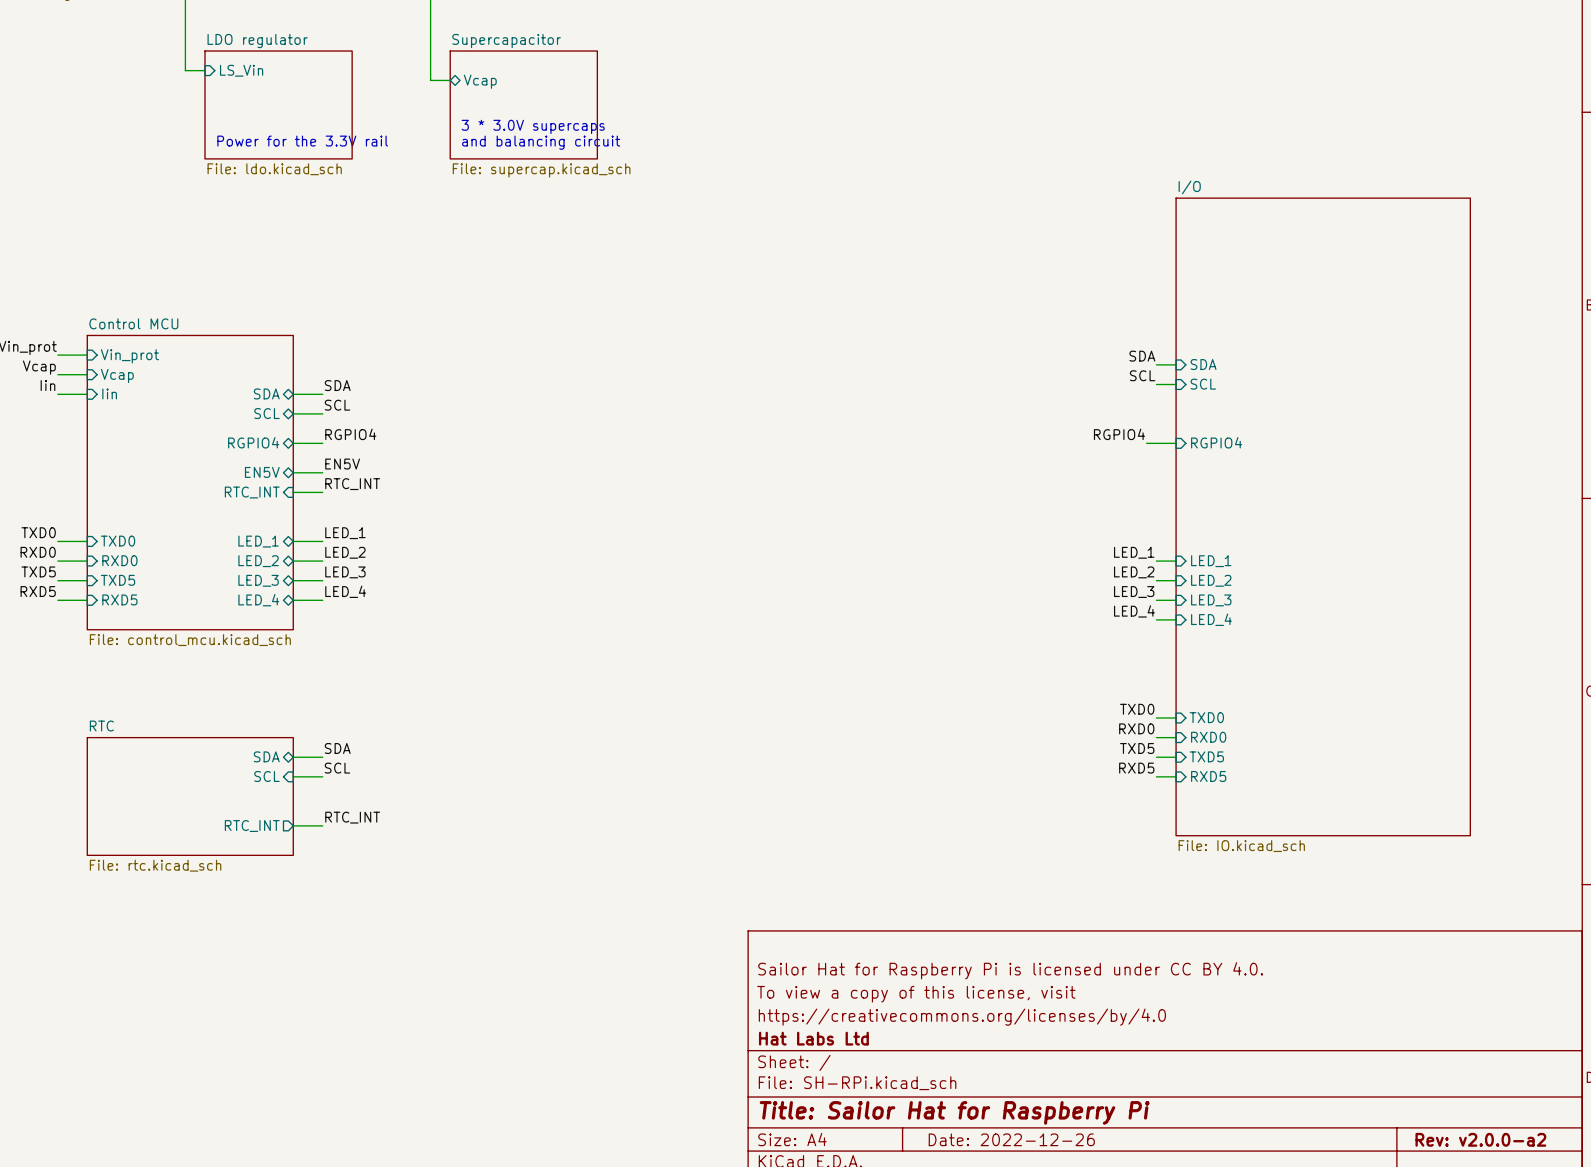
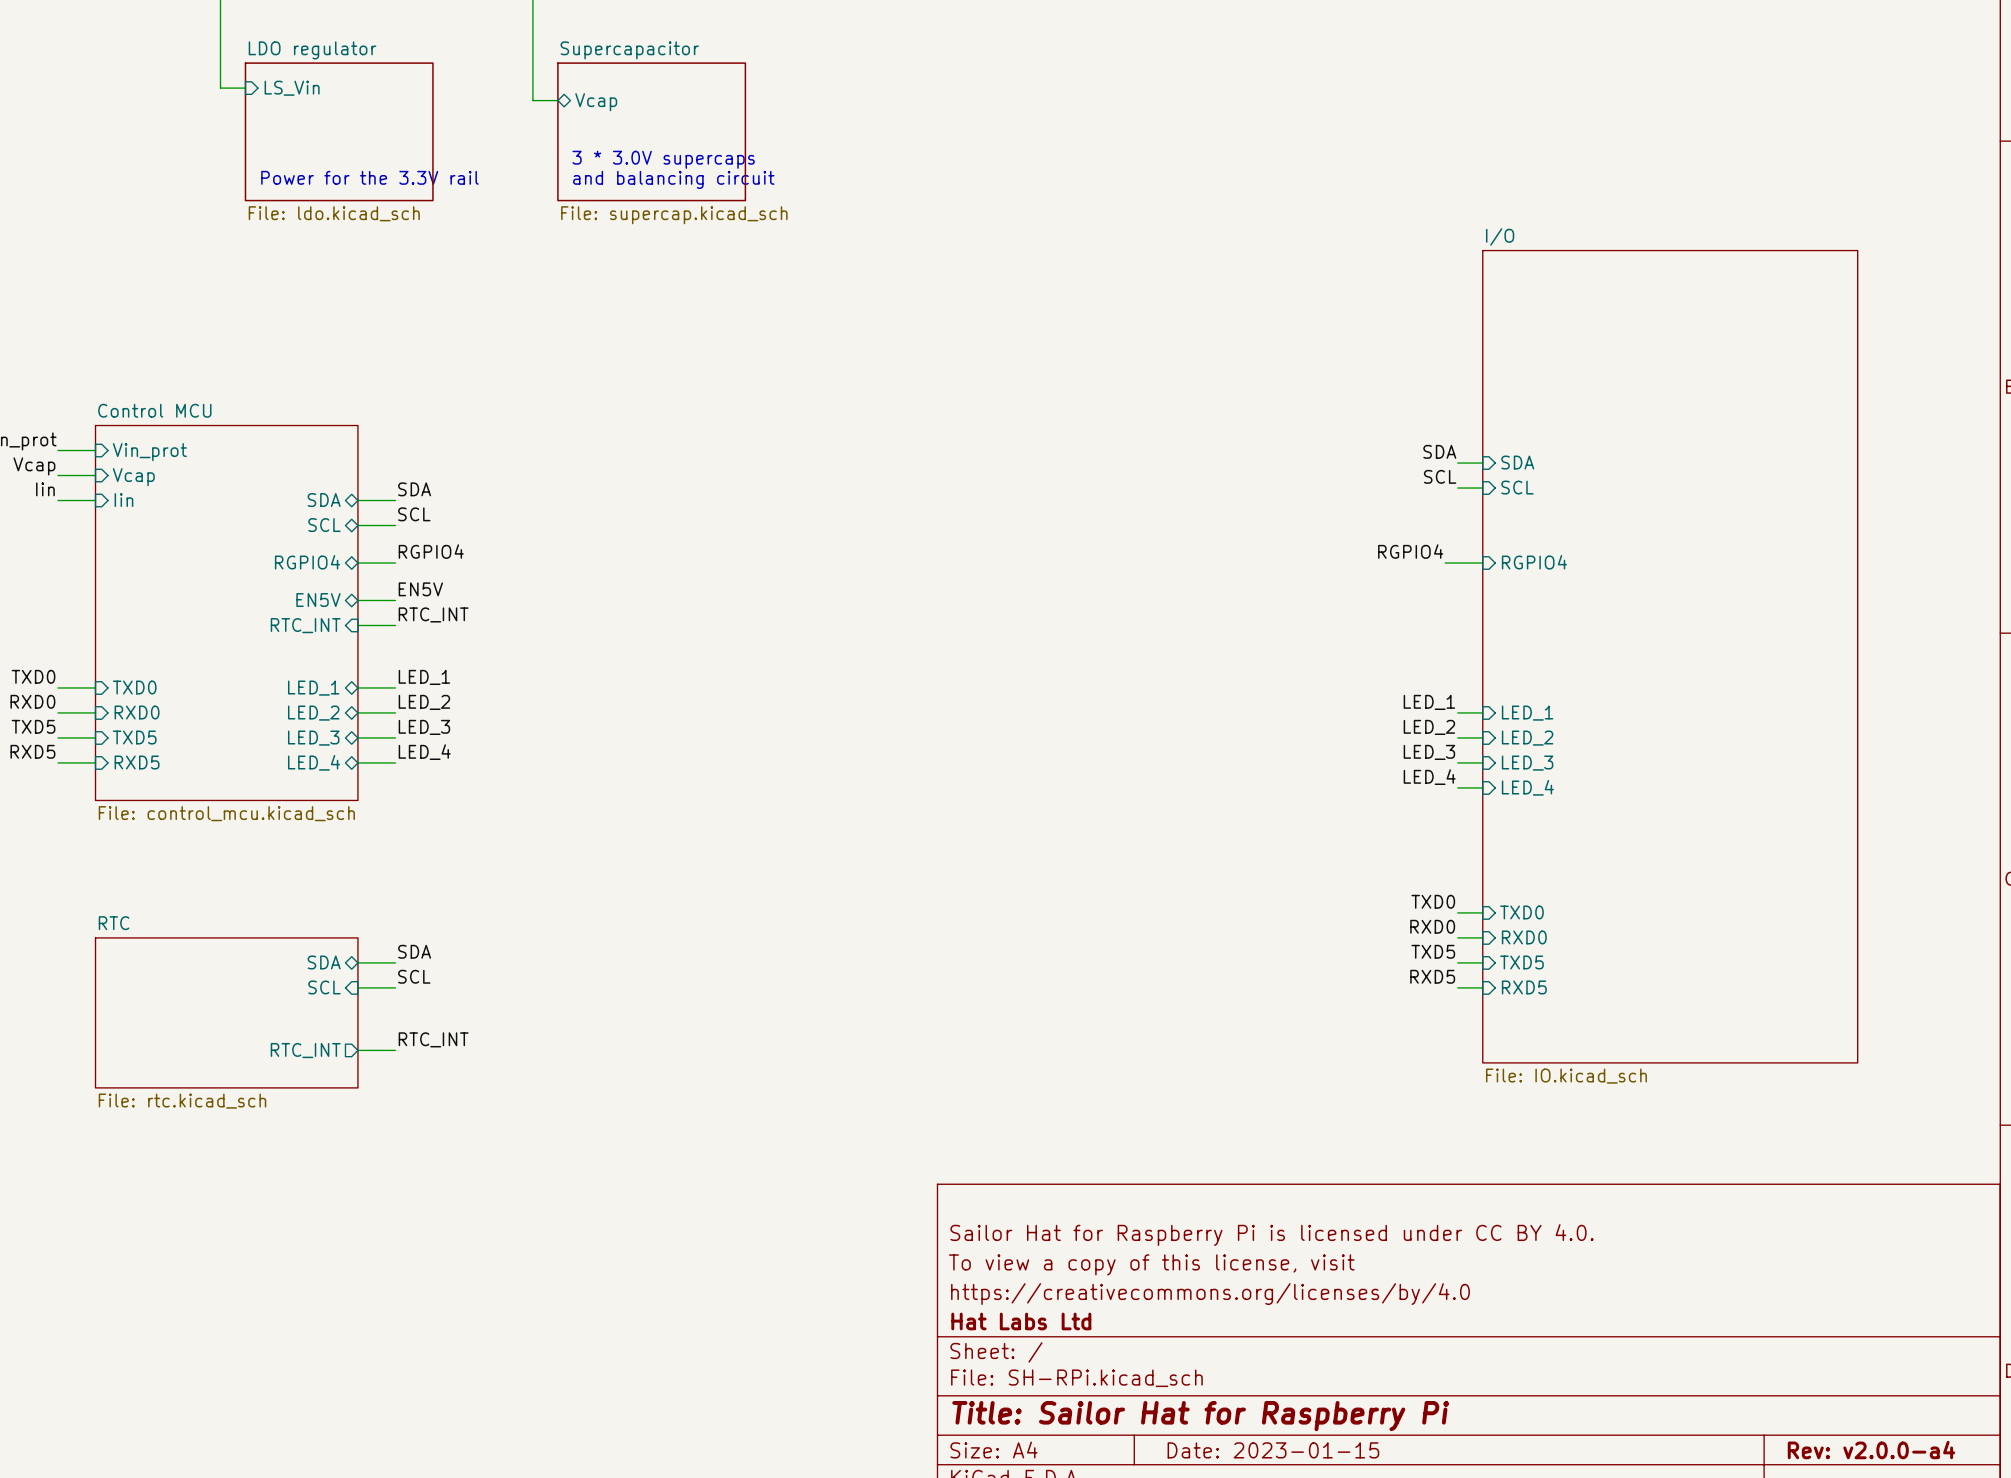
title block: Date: 2022-12-26 (1011, 1139) -> Date: 2023-01-15 (1273, 1450)
title block: Rev: v2.0.0-a2 (1480, 1139) -> Rev: v2.0.0-a4 (1871, 1450)

